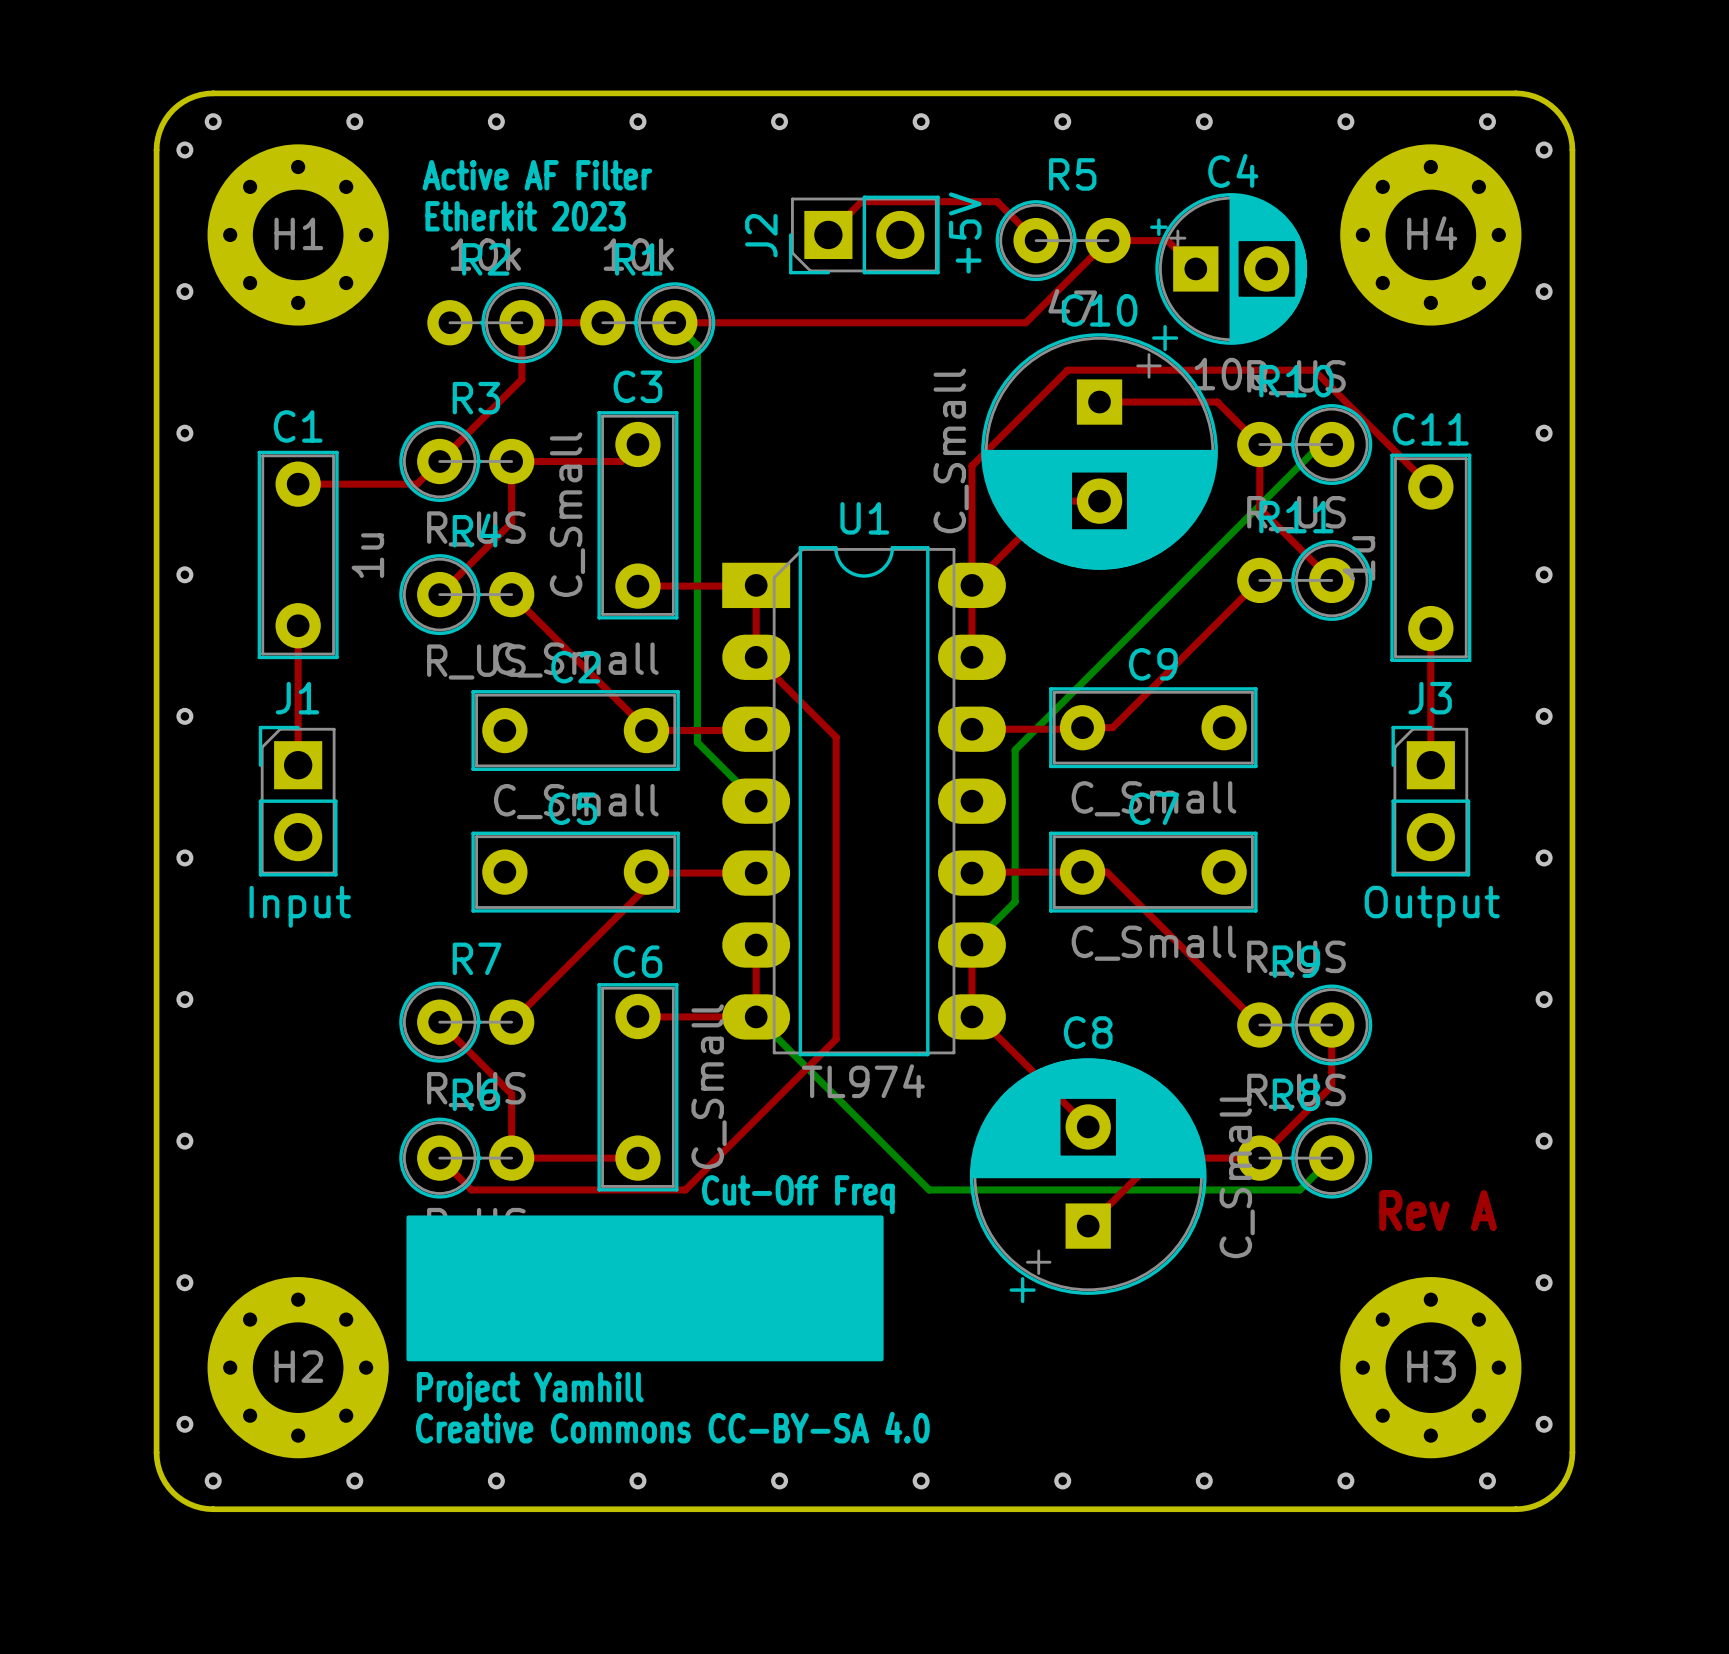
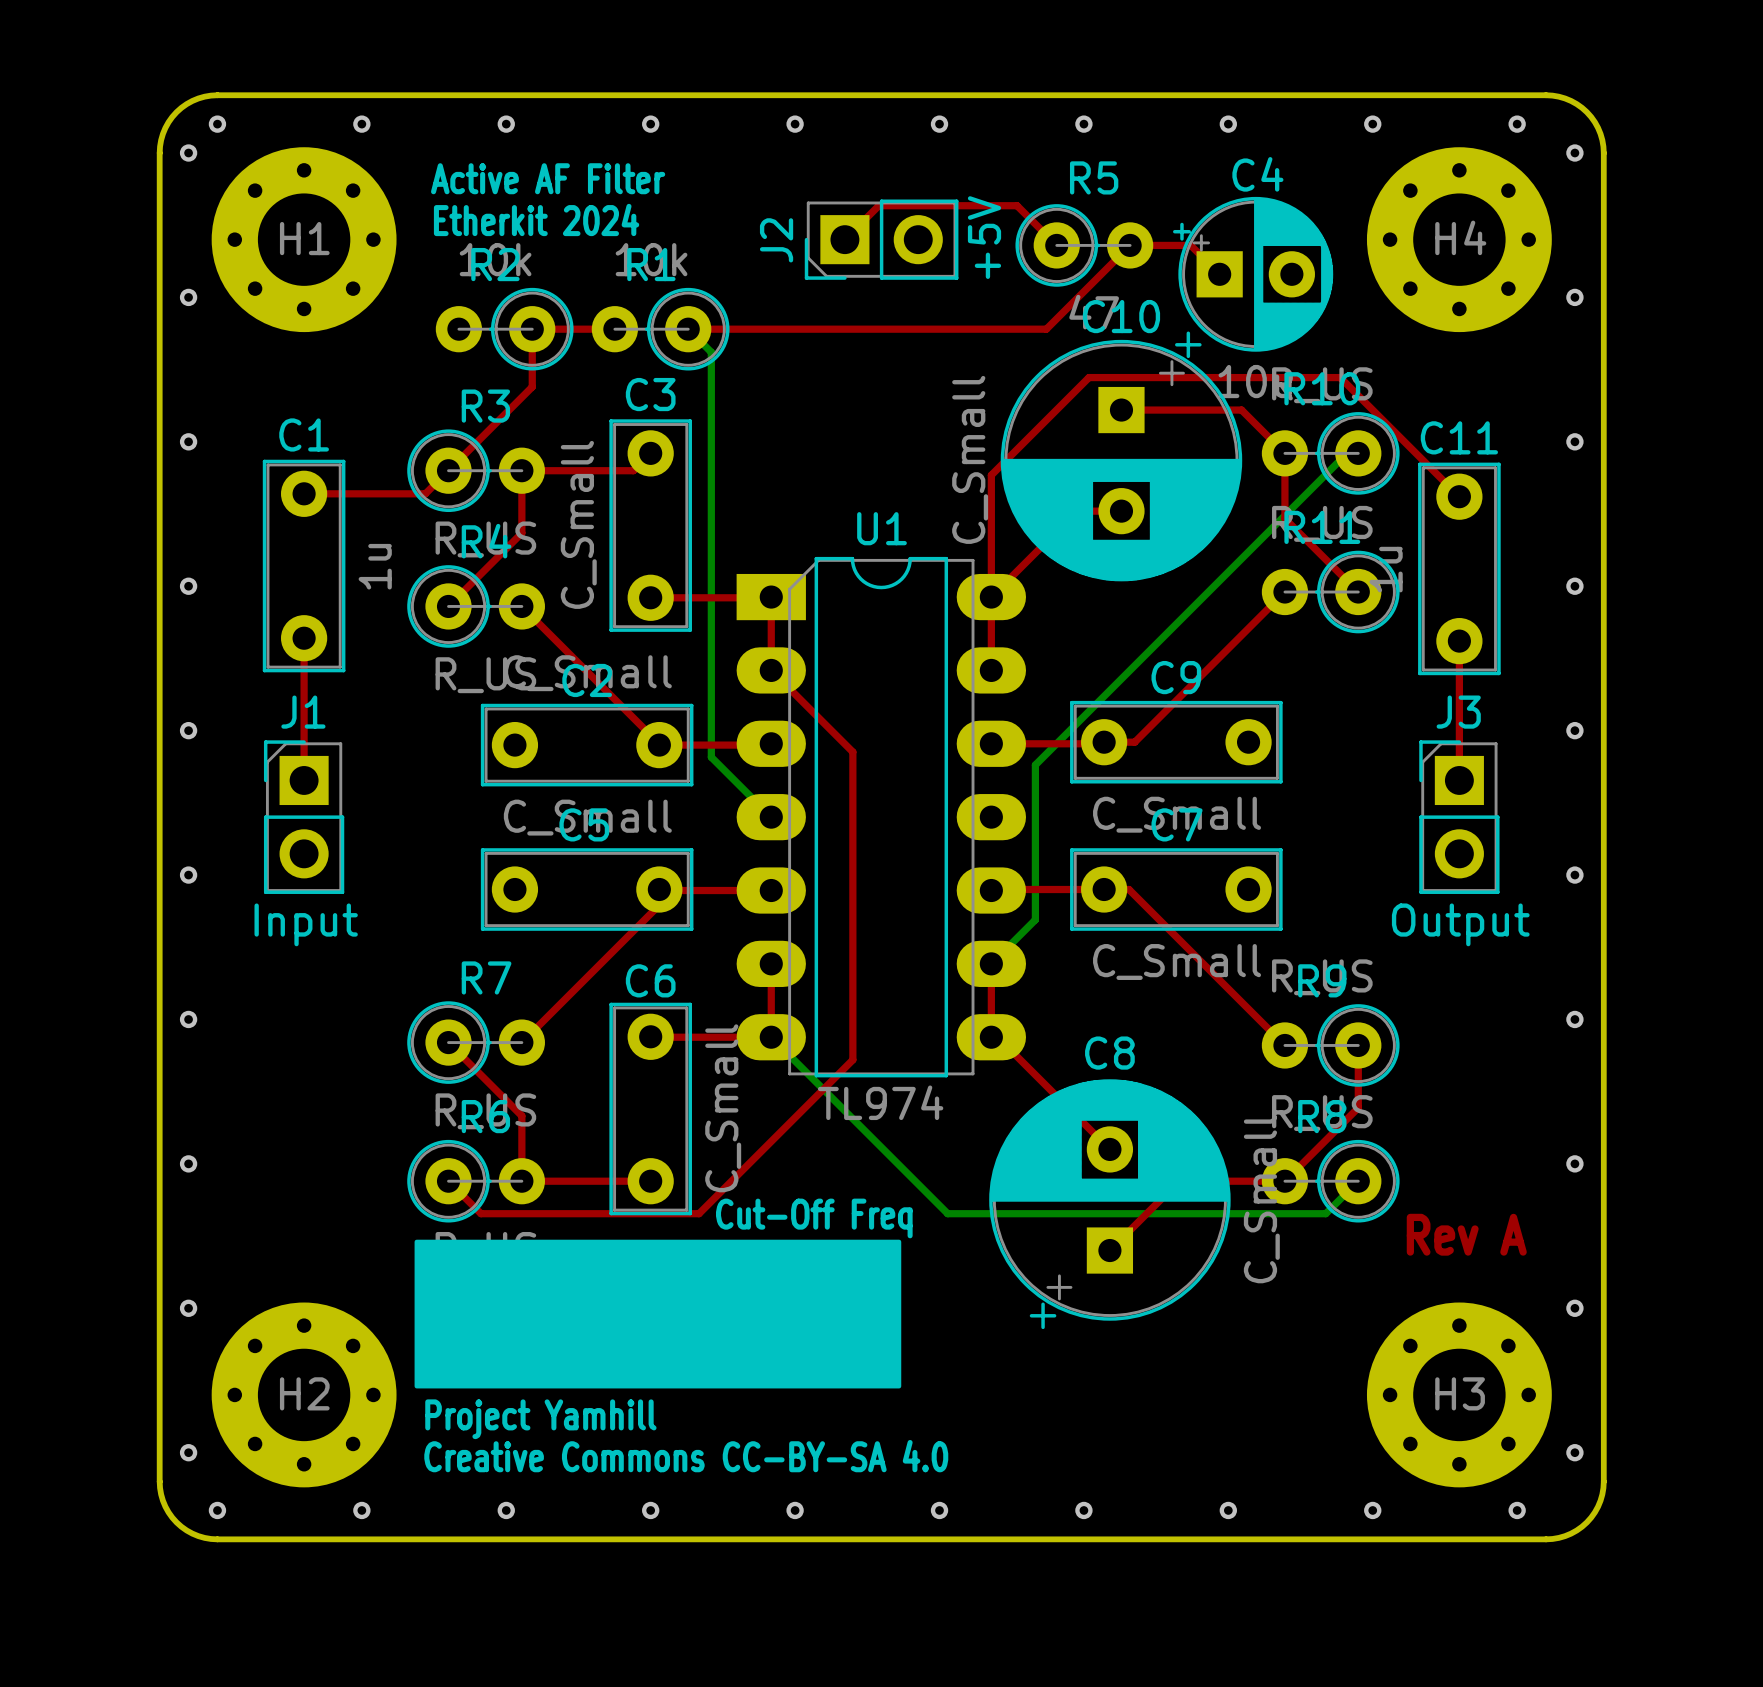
text: Etherkit 2023 (525, 216) -> Etherkit 2024 (536, 219)

